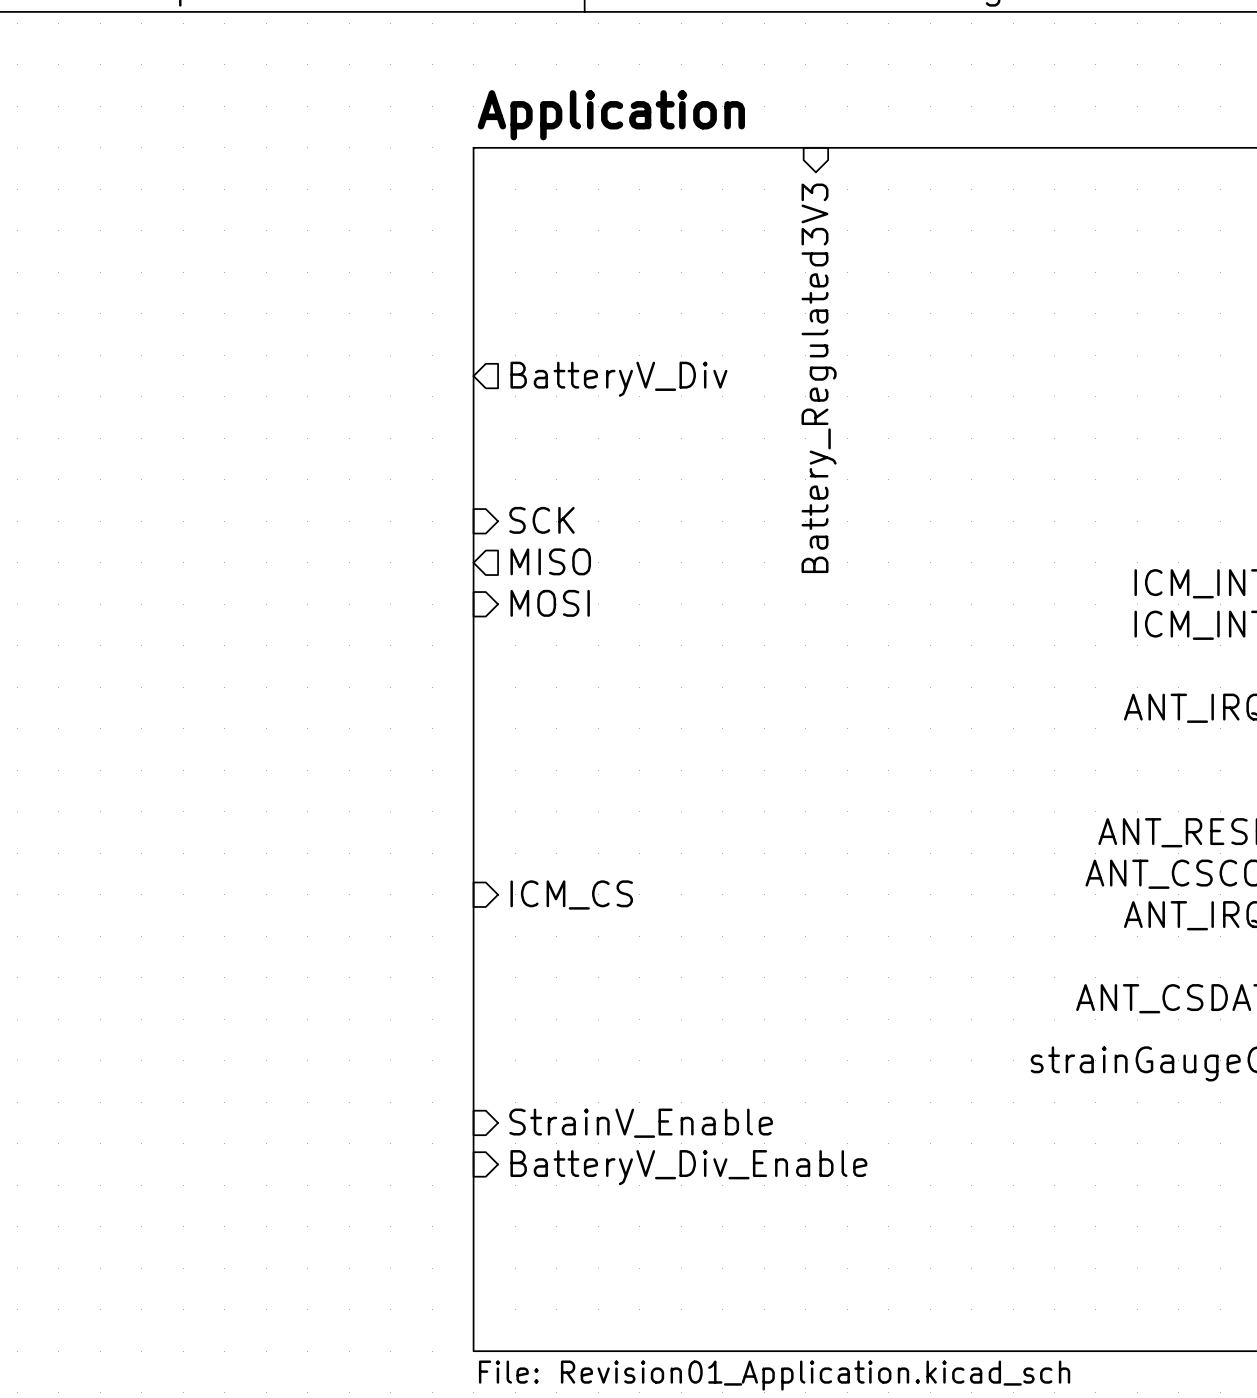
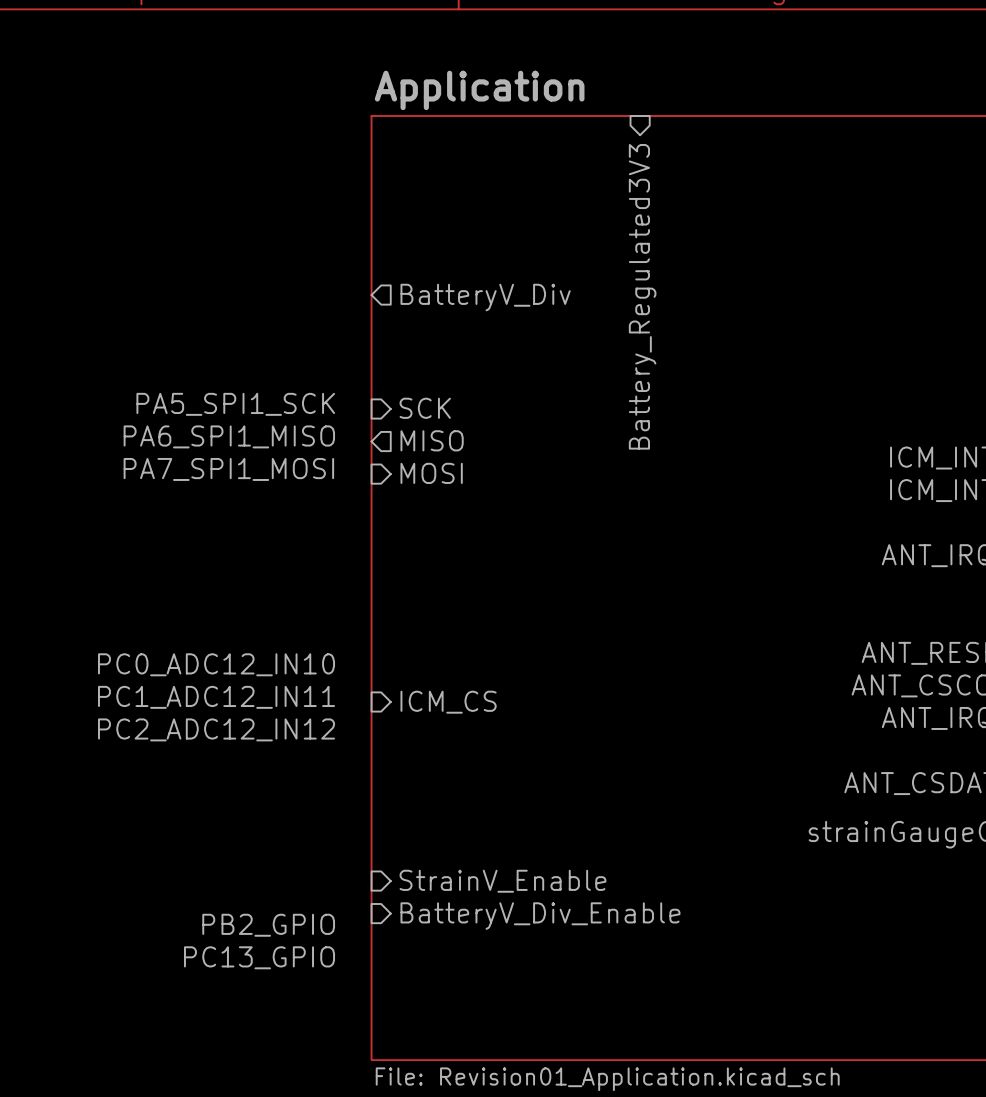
label: none -> PA5_SPI1_SCK (235, 404)
label: none -> PA6_SPI1_MISO (229, 436)
label: none -> PA7_SPI1_MOSI (228, 469)
label: none -> PC0_ADC12_IN10 (216, 664)
label: none -> PC1_ADC12_IN11 (216, 697)
label: none -> PC2_ADC12_IN12 (216, 729)
label: none -> PB2_GPIO (268, 925)
label: none -> PC13_GPIO (259, 957)

